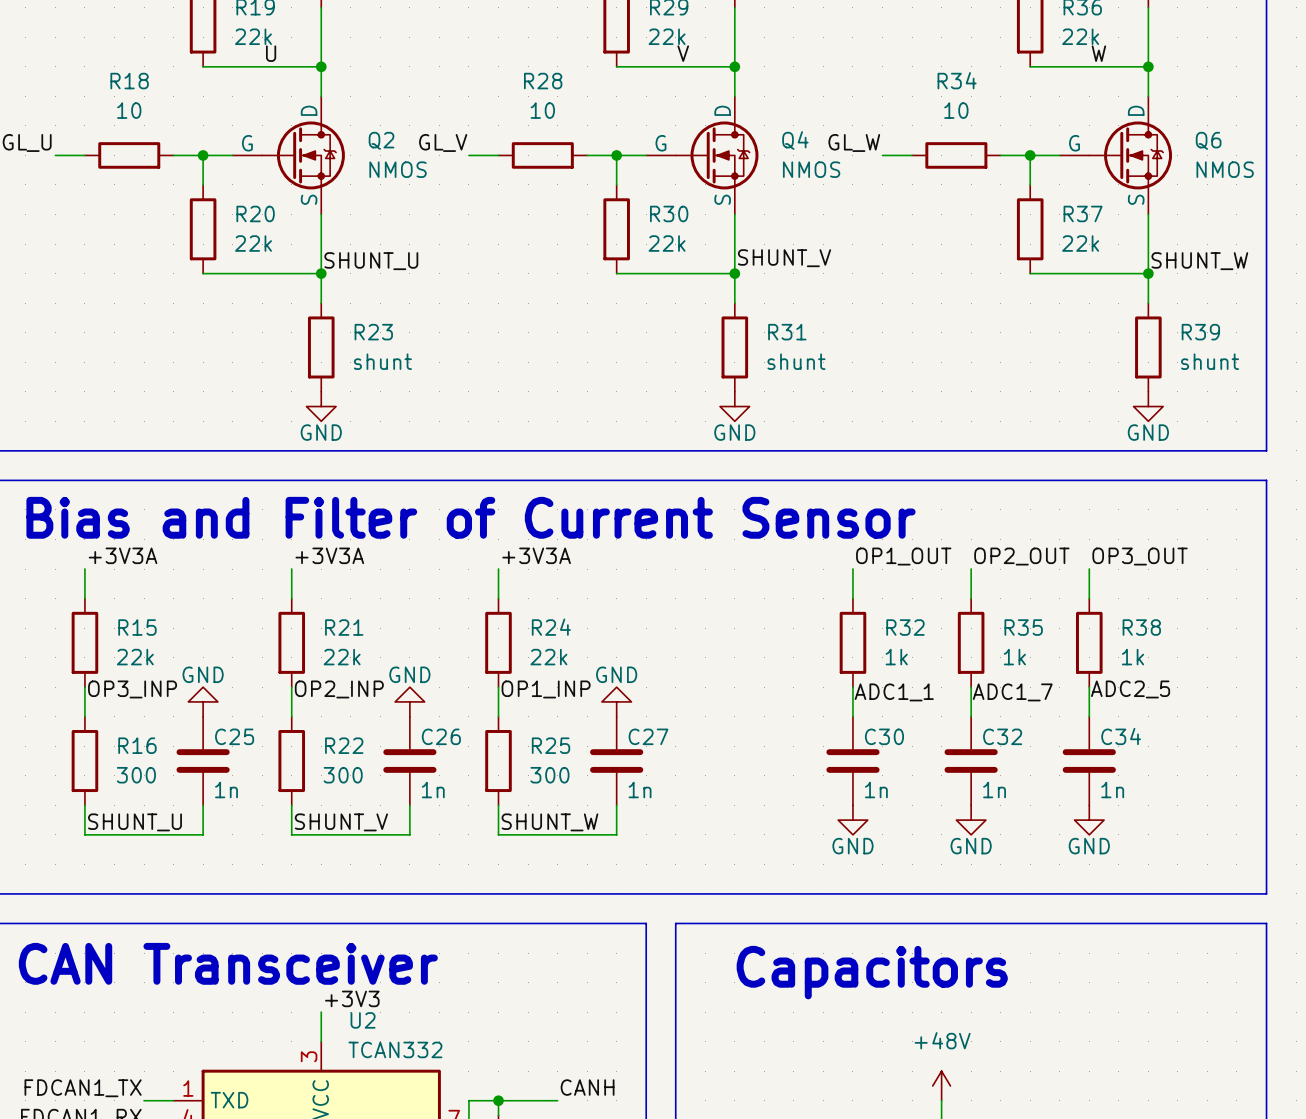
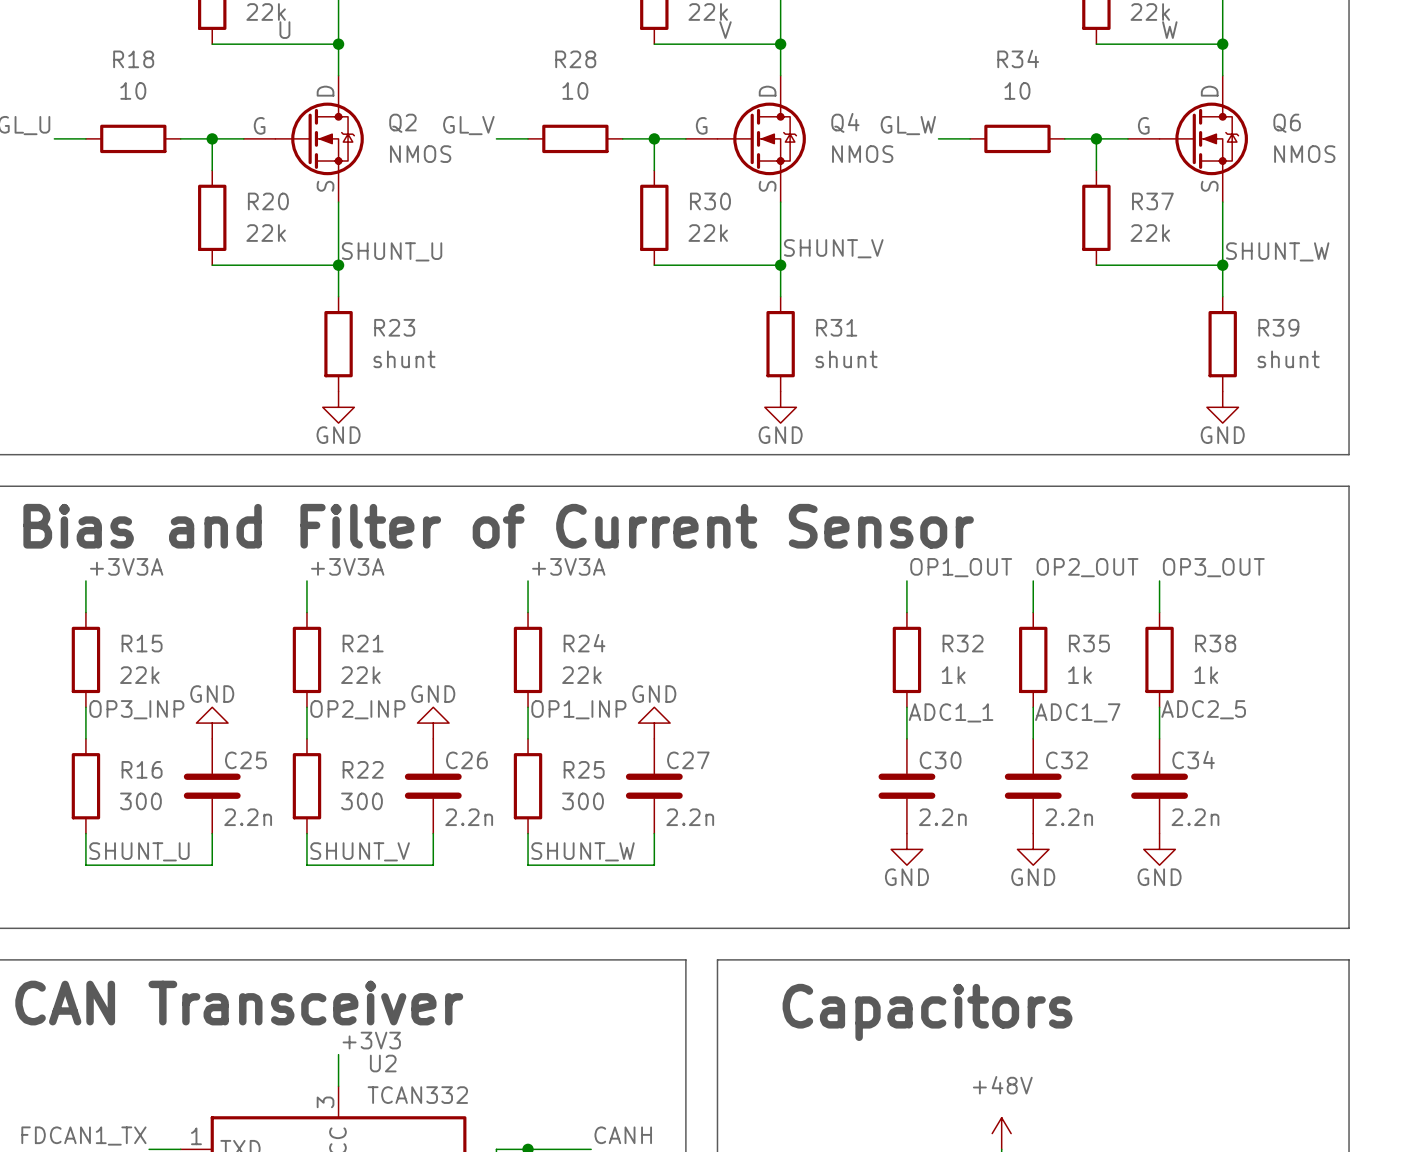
C25 value: 1n (226, 790) -> 2.2n (248, 817)
C26 value: 1n (433, 790) -> 2.2n (469, 817)
C27 value: 1n (640, 790) -> 2.2n (690, 817)
C30 value: 1n (876, 790) -> 2.2n (942, 817)
C32 value: 1n (994, 790) -> 2.2n (1069, 817)
C34 value: 1n (1112, 790) -> 2.2n (1195, 817)

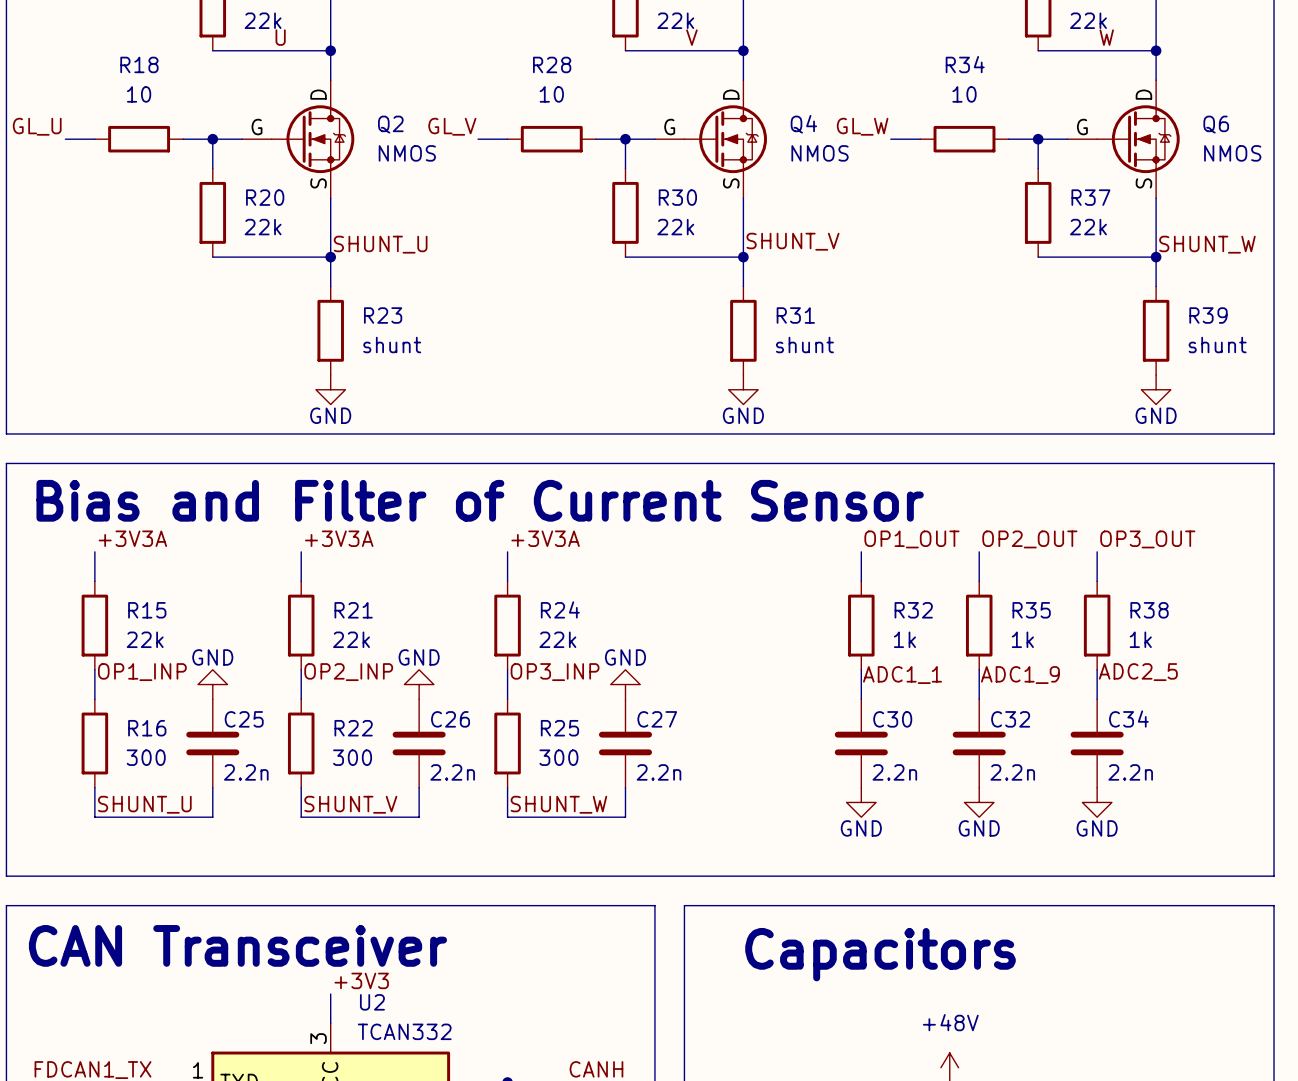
label: OP3_INP (136, 709) -> OP1_INP (142, 672)
label: OP1_INP (578, 709) -> OP3_INP (555, 672)
label: ADC1_7 (1077, 712) -> ADC1_9 (1020, 675)

